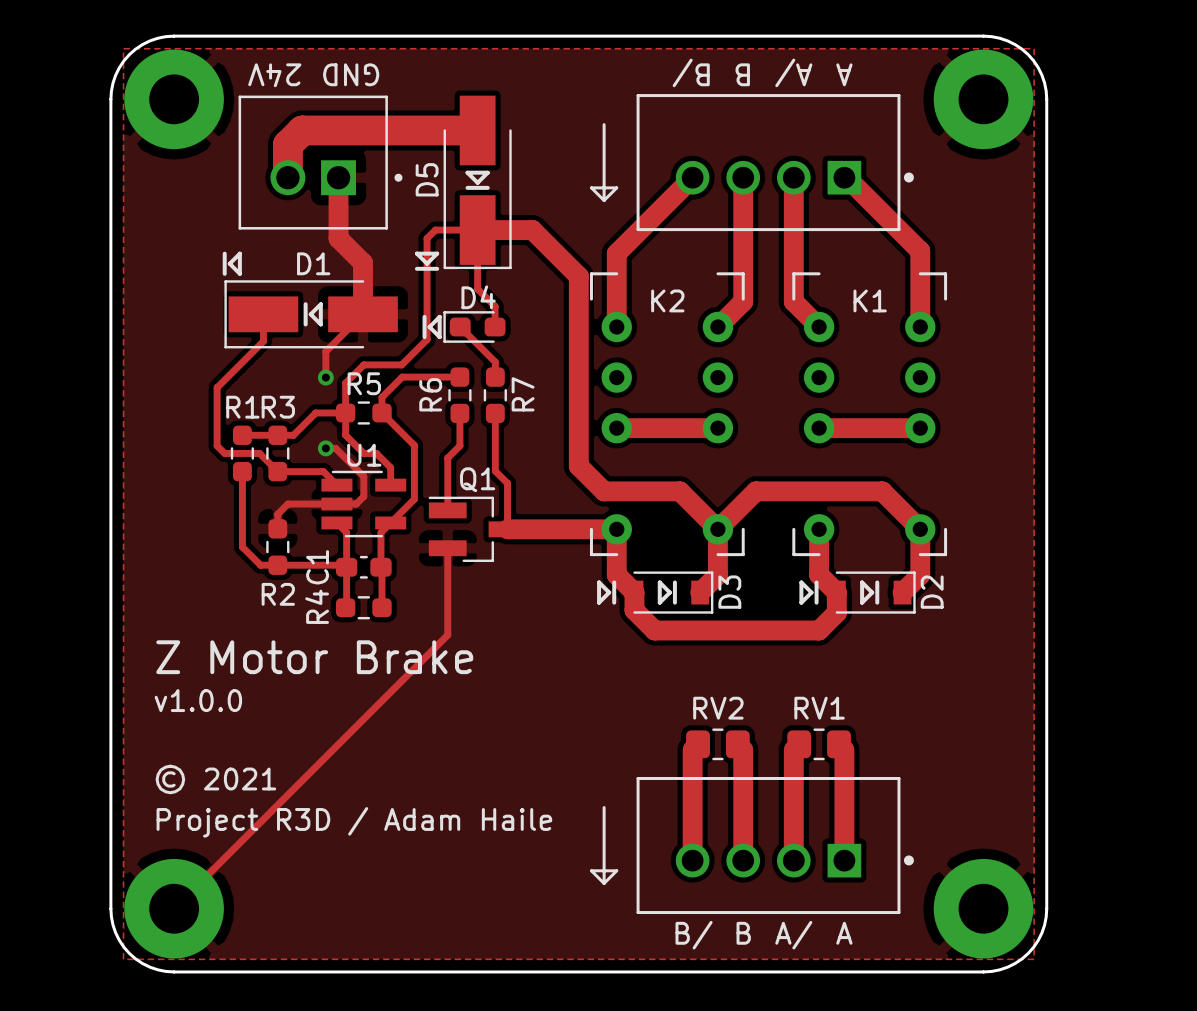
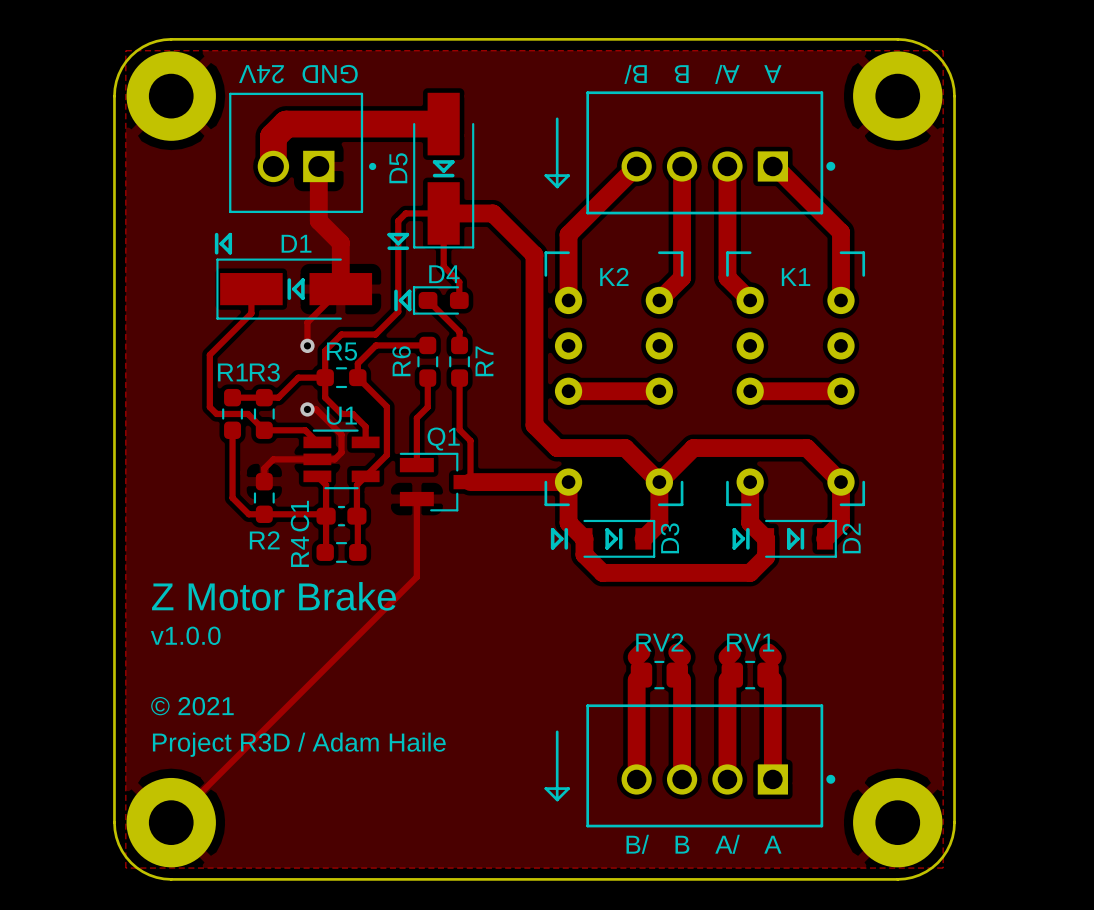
track: none -> (641, 652) (636, 657)
track: none -> (677, 652) (682, 657)
track: none -> (732, 652) (727, 657)
track: none -> (768, 652) (772, 657)

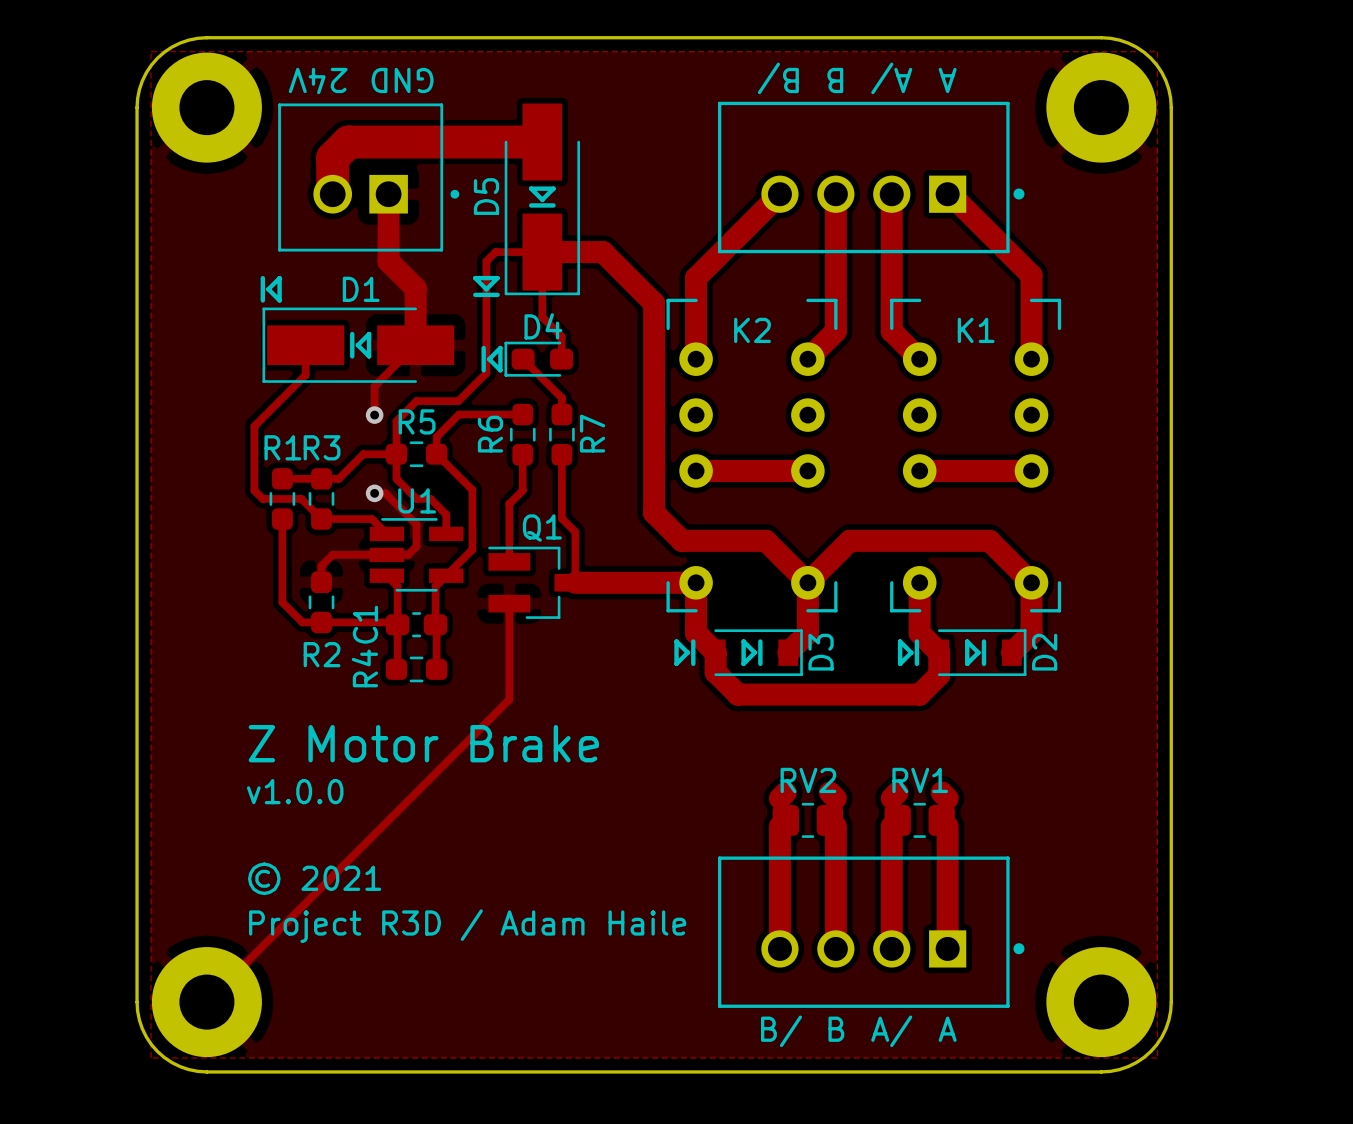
line: (557, 118) (557, 186) -> none
line: (557, 186) (568, 175) (545, 175) (557, 186) -> none
text position: Z Motor Brake (274, 596) -> Z Motor Brake (423, 743)
text position: v1.0.0 (185, 635) -> v1.0.0 (295, 791)
text position: © 2021 (192, 706) -> © 2021 (314, 878)
line: (557, 731) (557, 799) -> none
text position: Project R3D / Adam Haile (299, 744) -> Project R3D / Adam Haile (467, 926)
line: (557, 799) (545, 788) (568, 788) (557, 799) -> none

